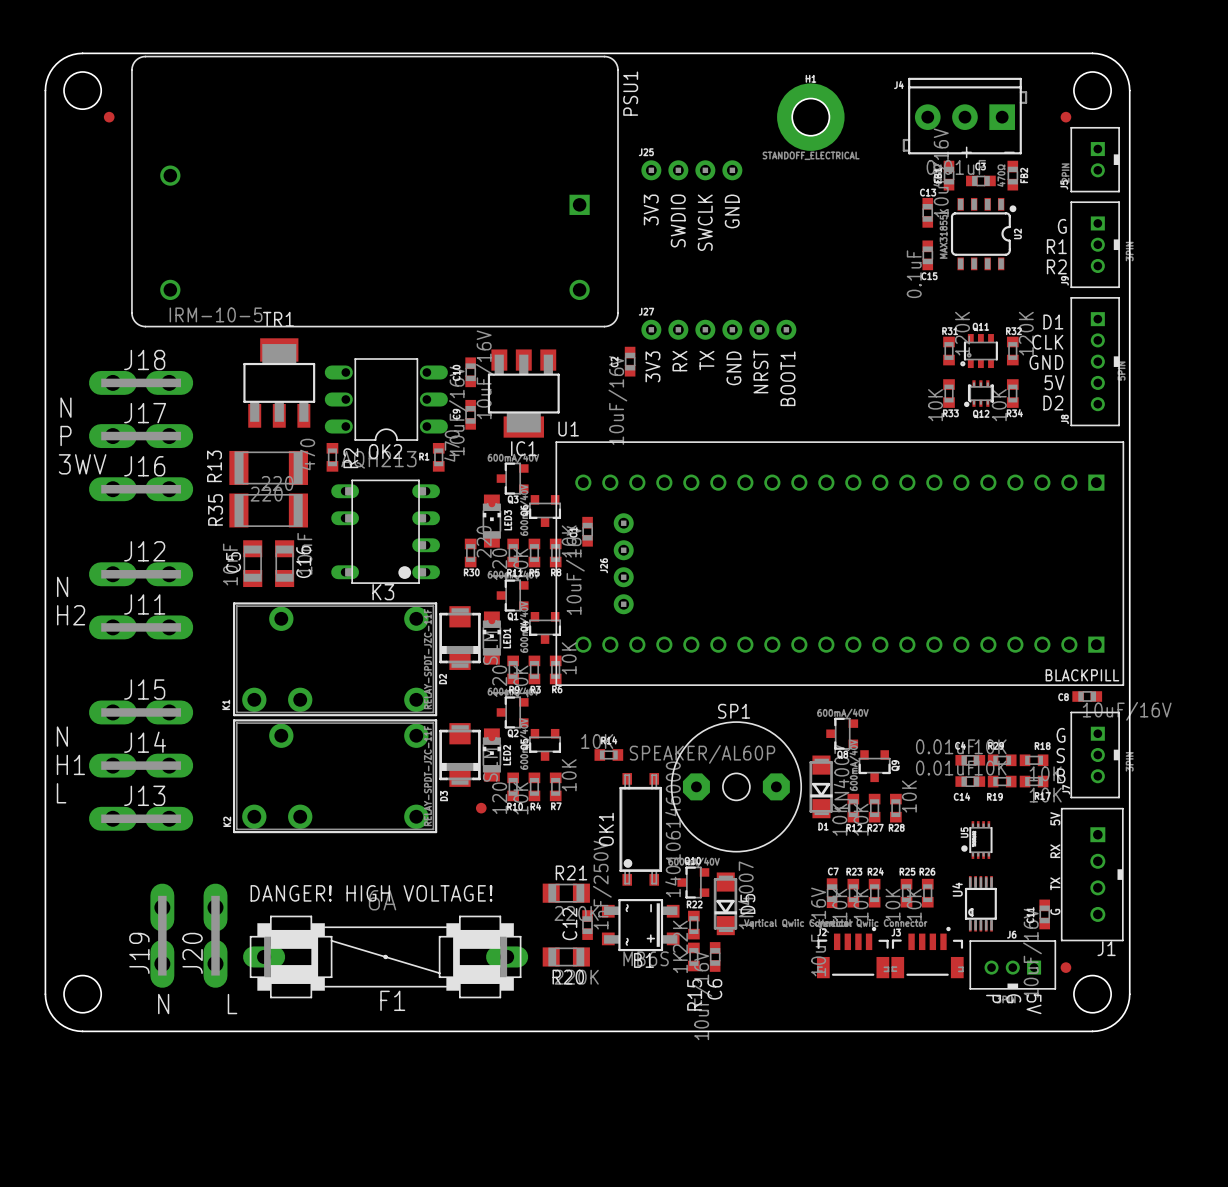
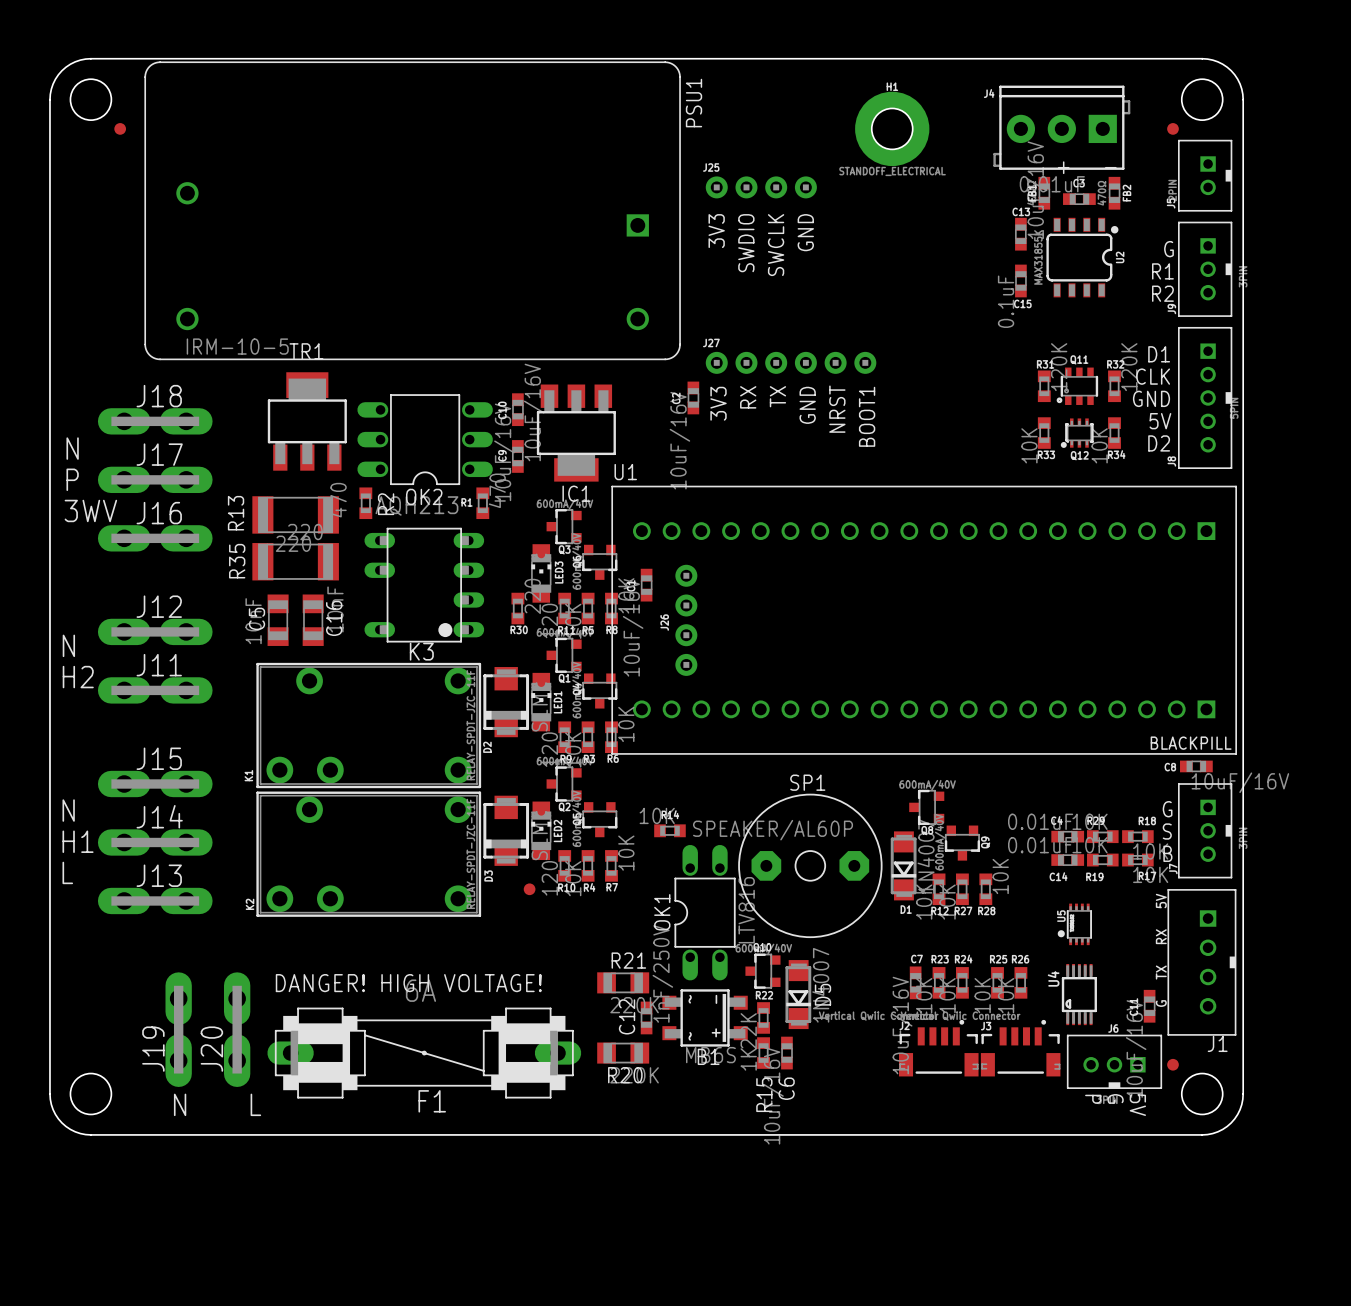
OK1 footprint: [619, 773, 662, 886] -> [674, 844, 736, 981]
OK1 value: 140106146000 (672, 829) -> LTV816 (746, 910)

